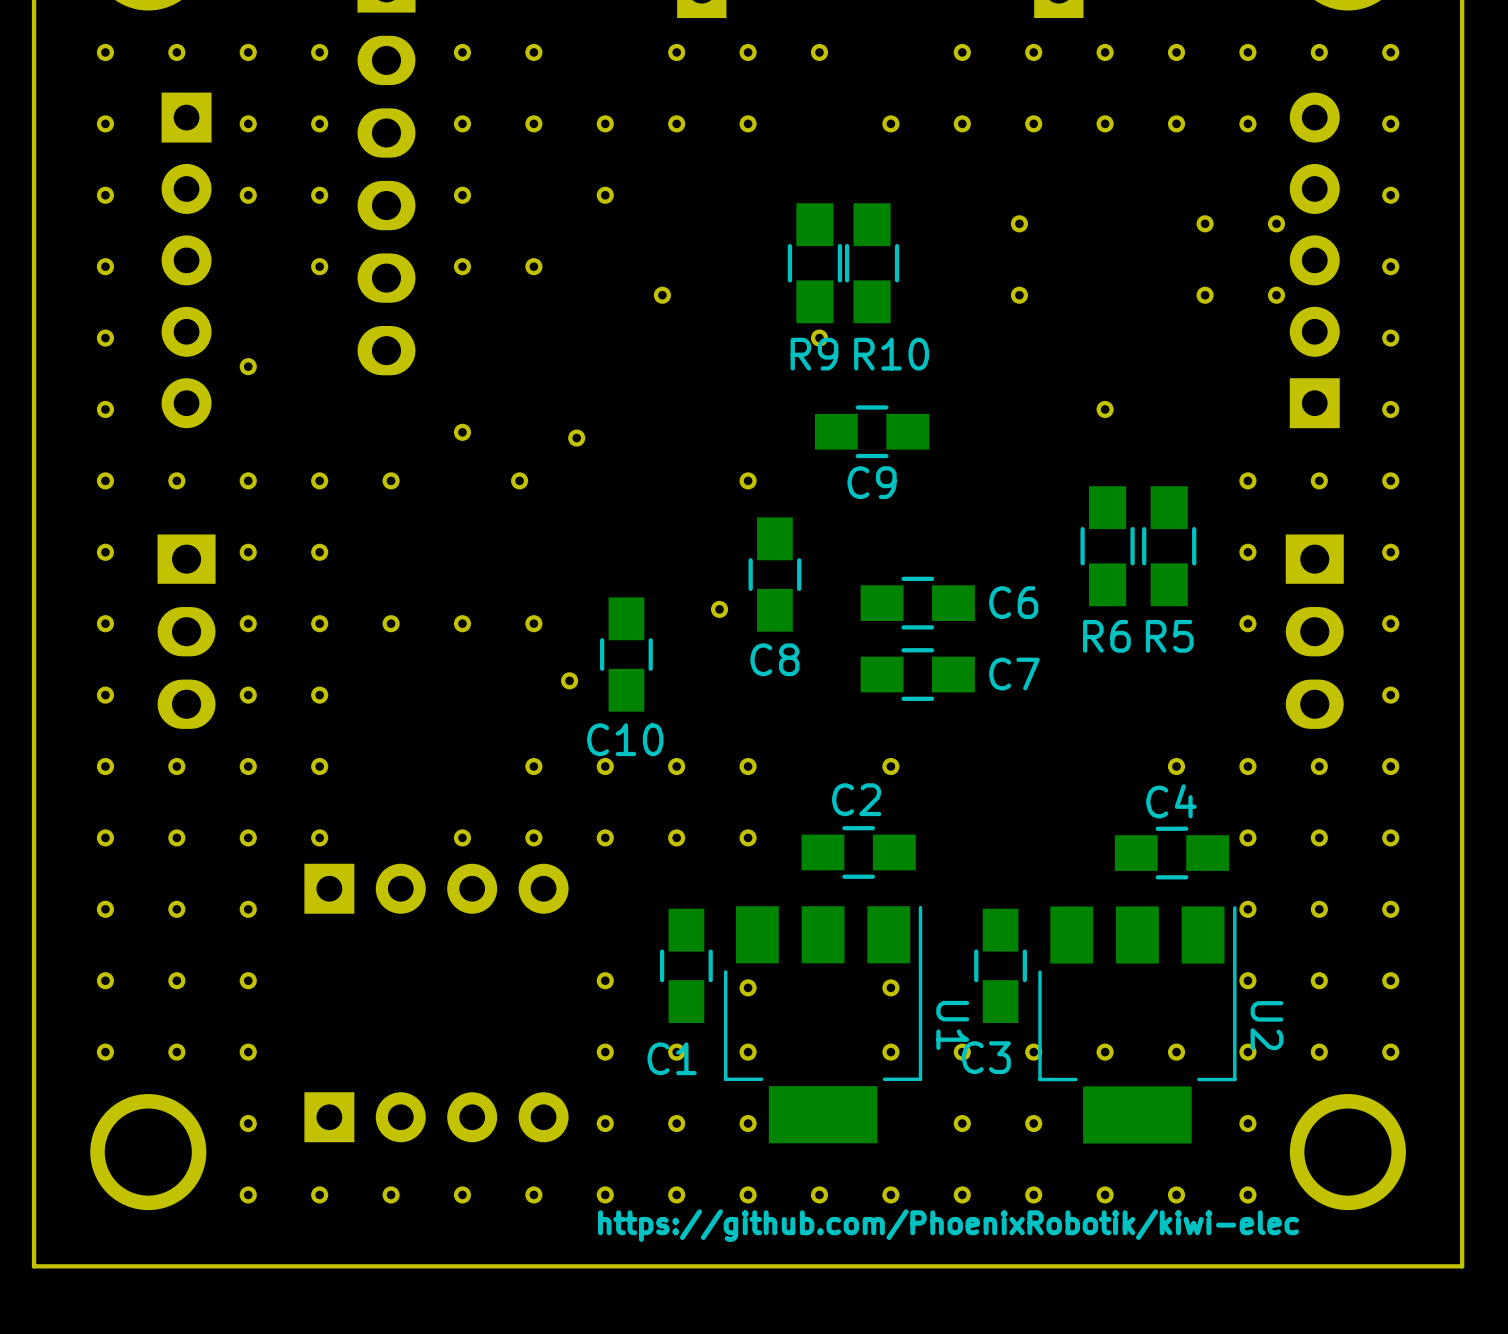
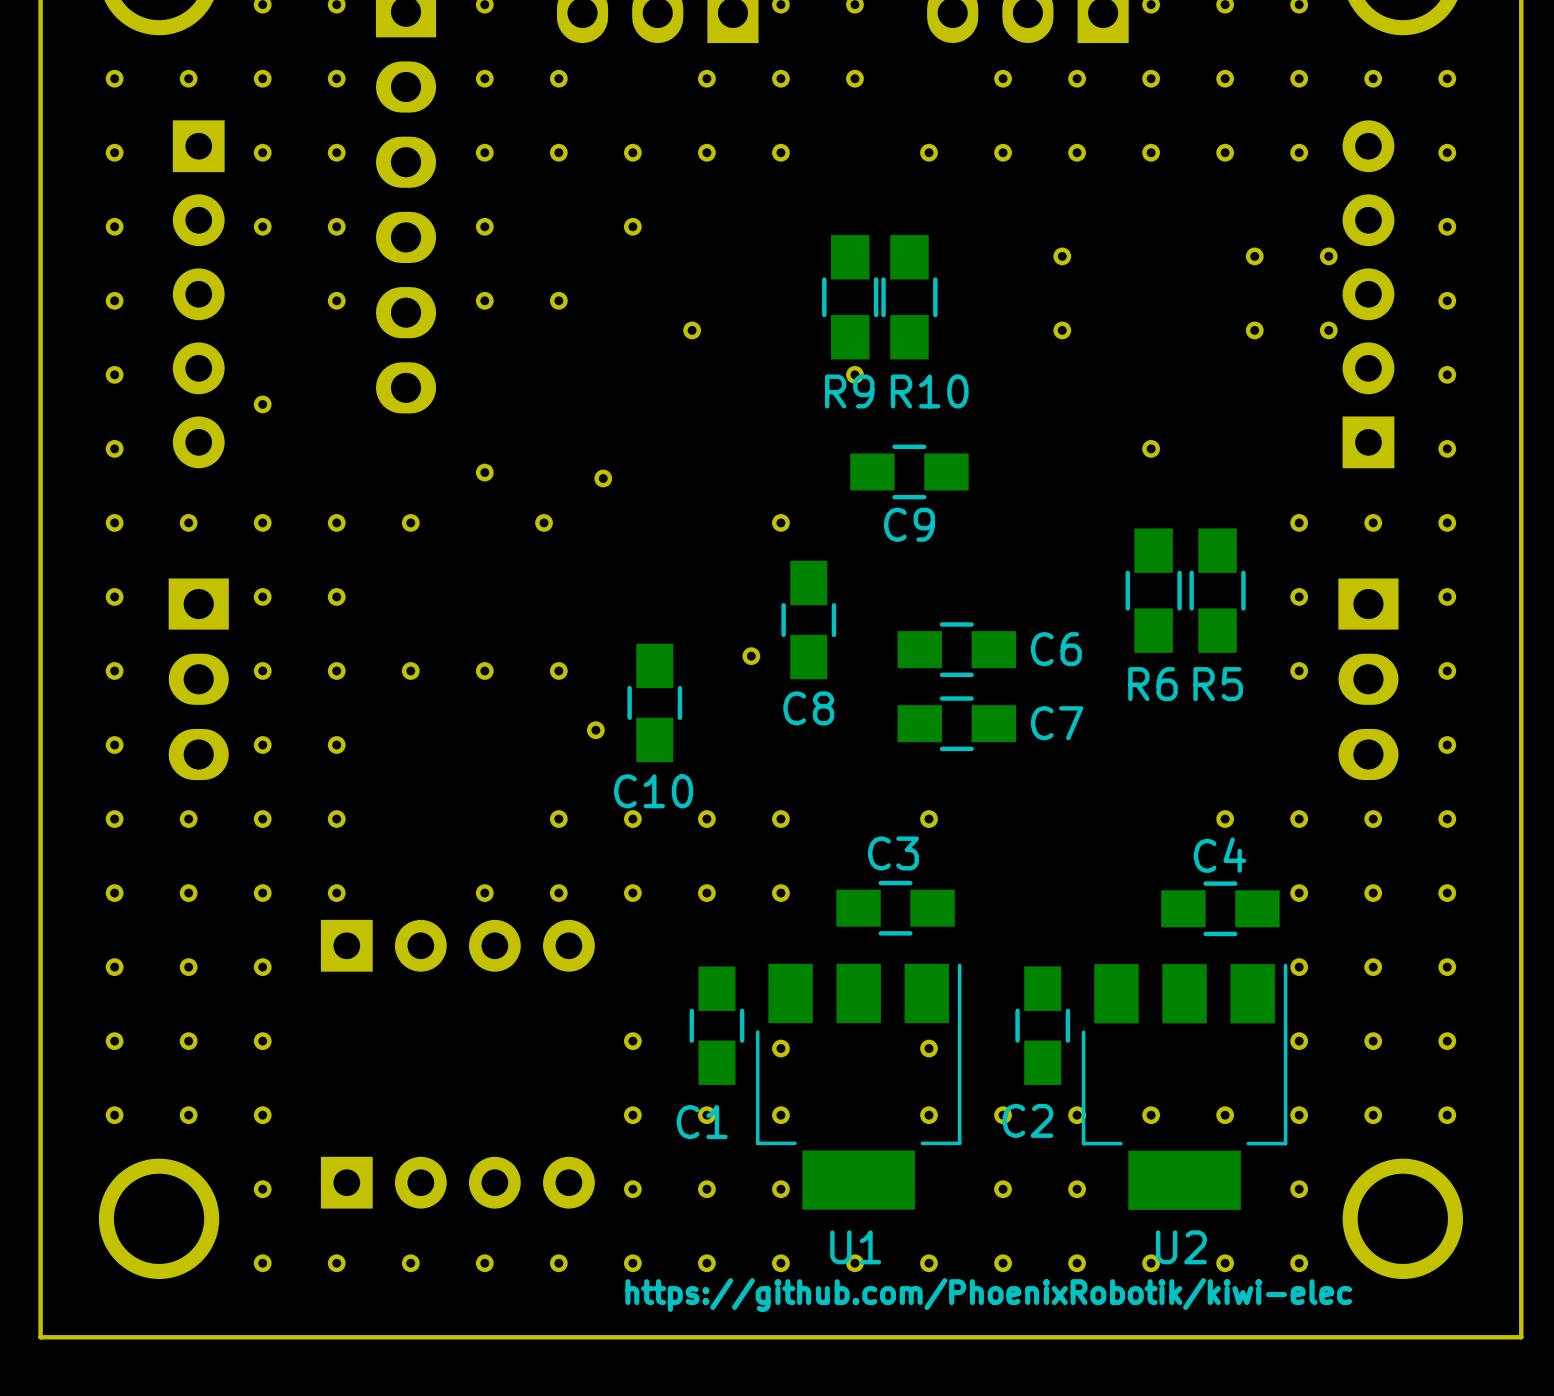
C2 name: C2 (856, 799) -> C3 (893, 853)
U1 name rotation: 0° (952, 1025) -> 90° counterclockwise (855, 1247)
U1 name position: U1 (952, 1025) -> U1 (855, 1247)
U2 name rotation: 0° (1266, 1025) -> 90° counterclockwise (1181, 1247)
U2 name position: U2 (1266, 1025) -> U2 (1181, 1247)
C3 name: C3 (986, 1057) -> C2 (1027, 1120)

